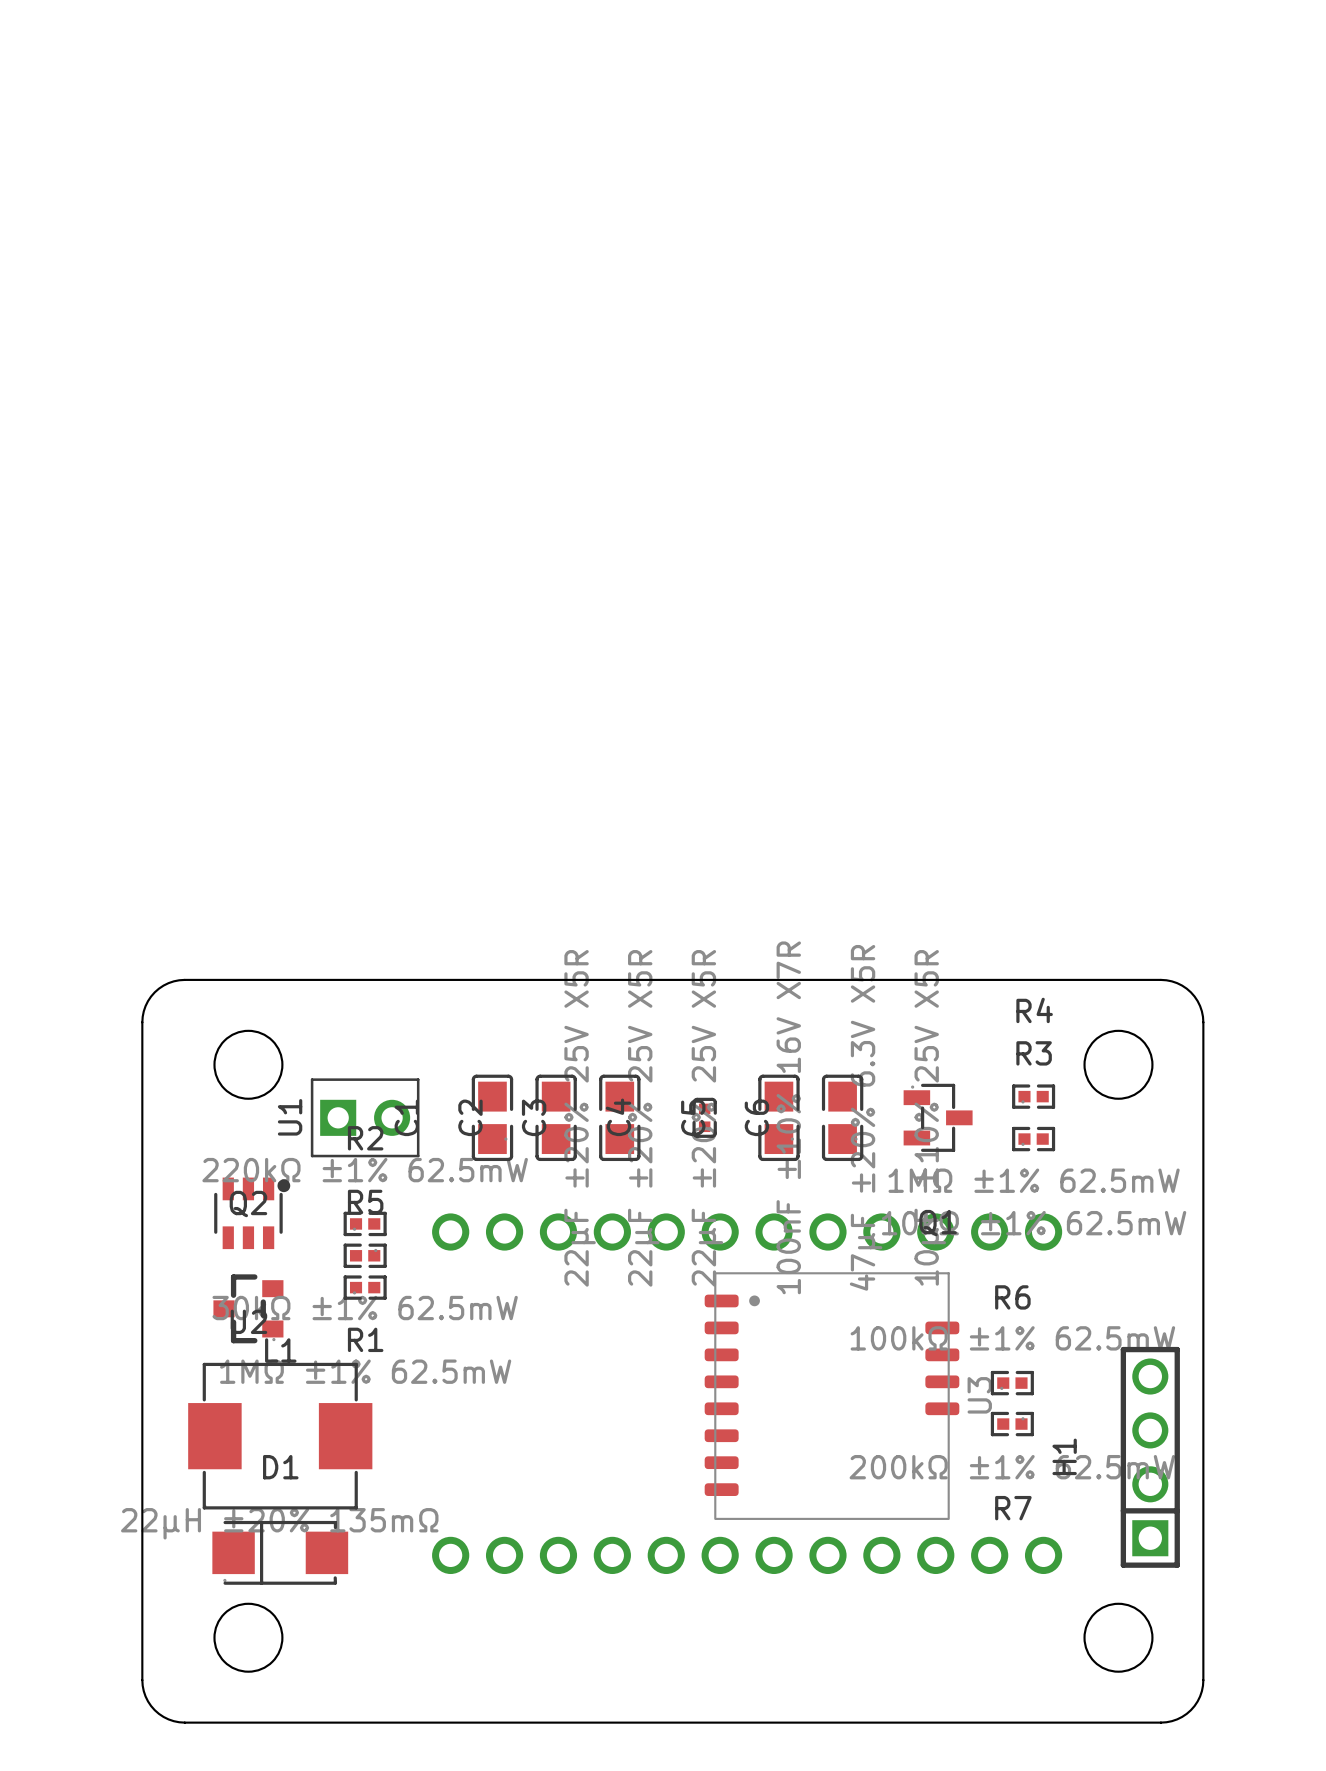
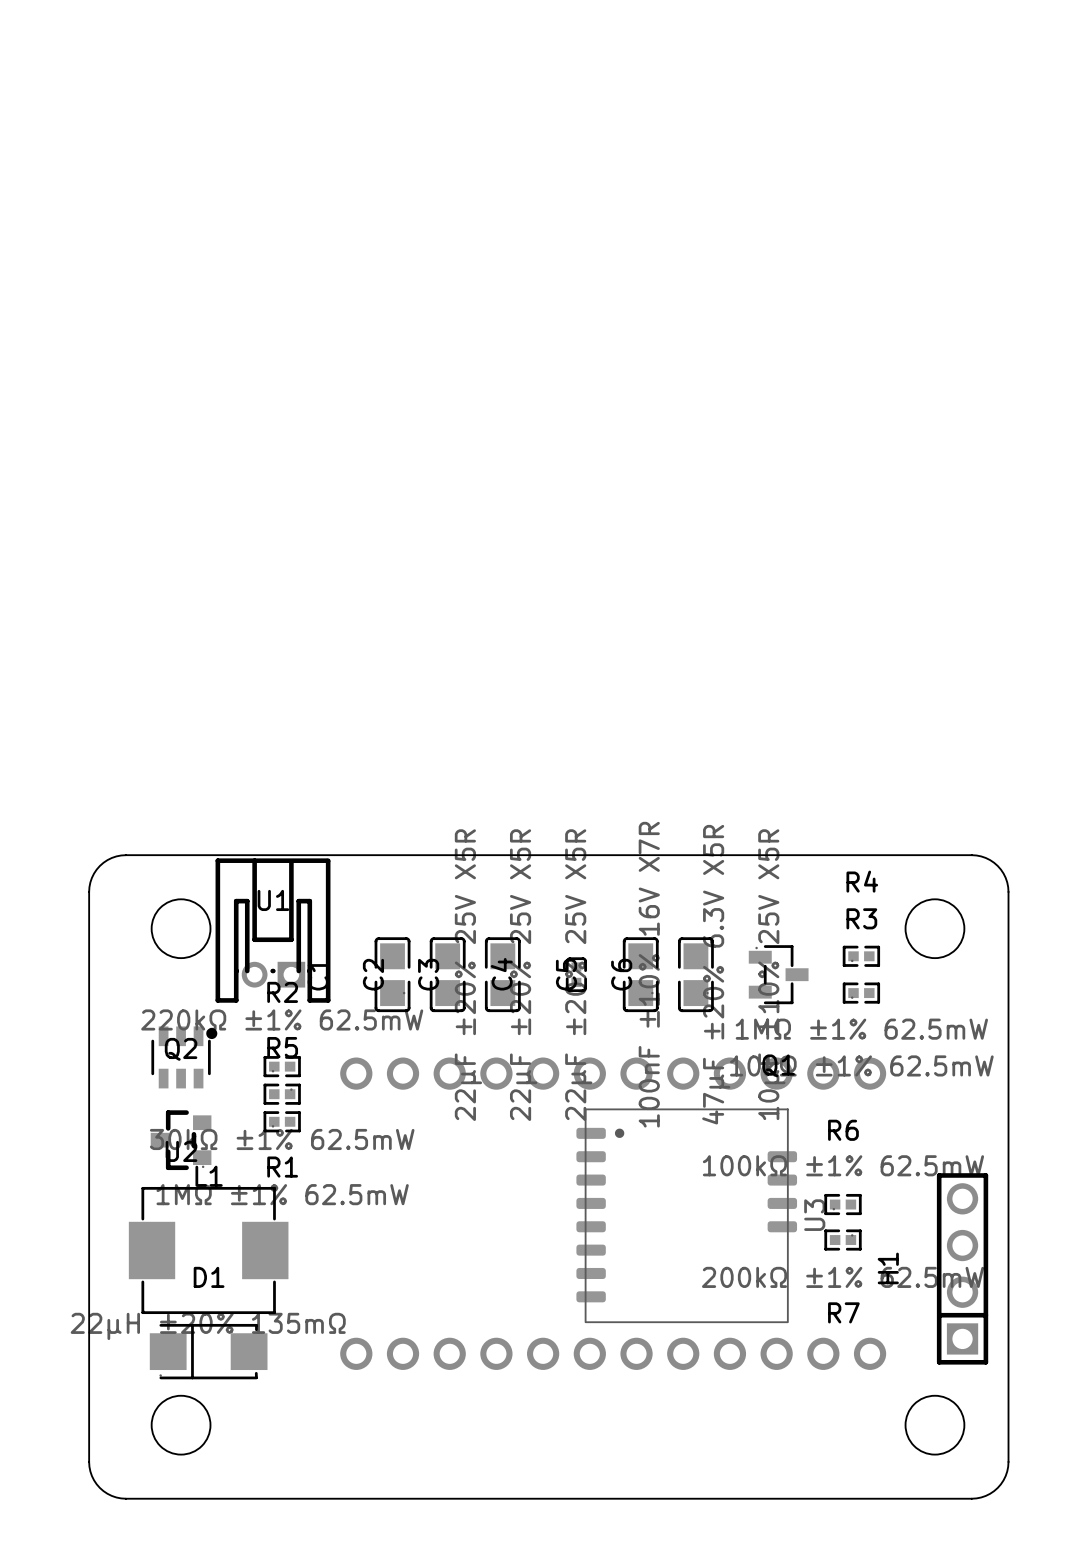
U1 footprint: [310, 1078, 420, 1158] -> [215, 858, 331, 1003]
U1 name position: U1 (290, 1117) -> U1 (273, 900)

